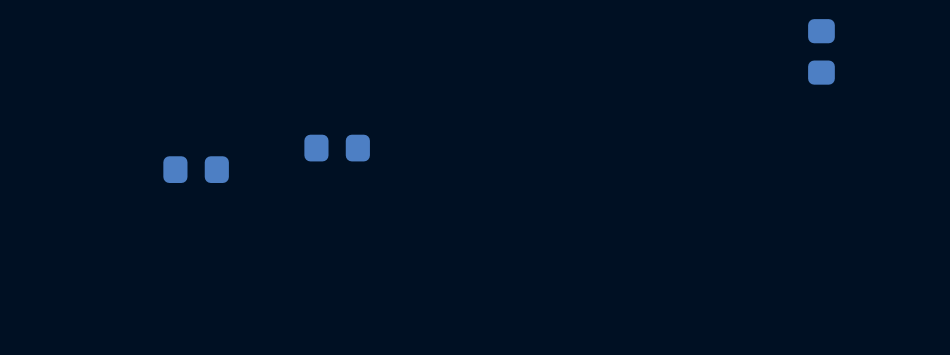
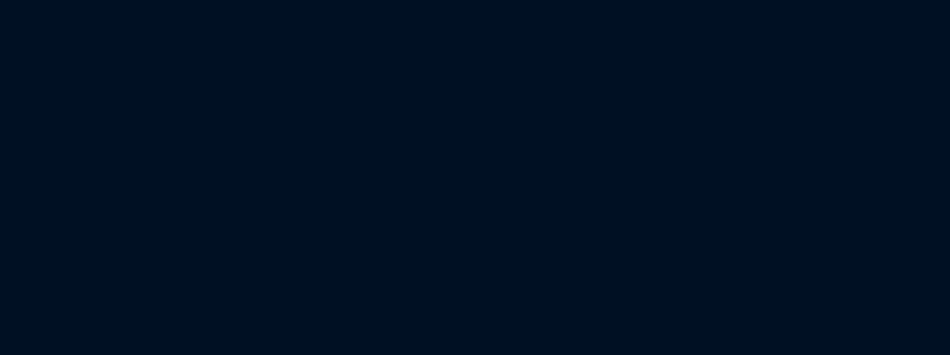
part: (821, 51) -> none
part: (337, 148) -> none
part: (196, 169) -> none

